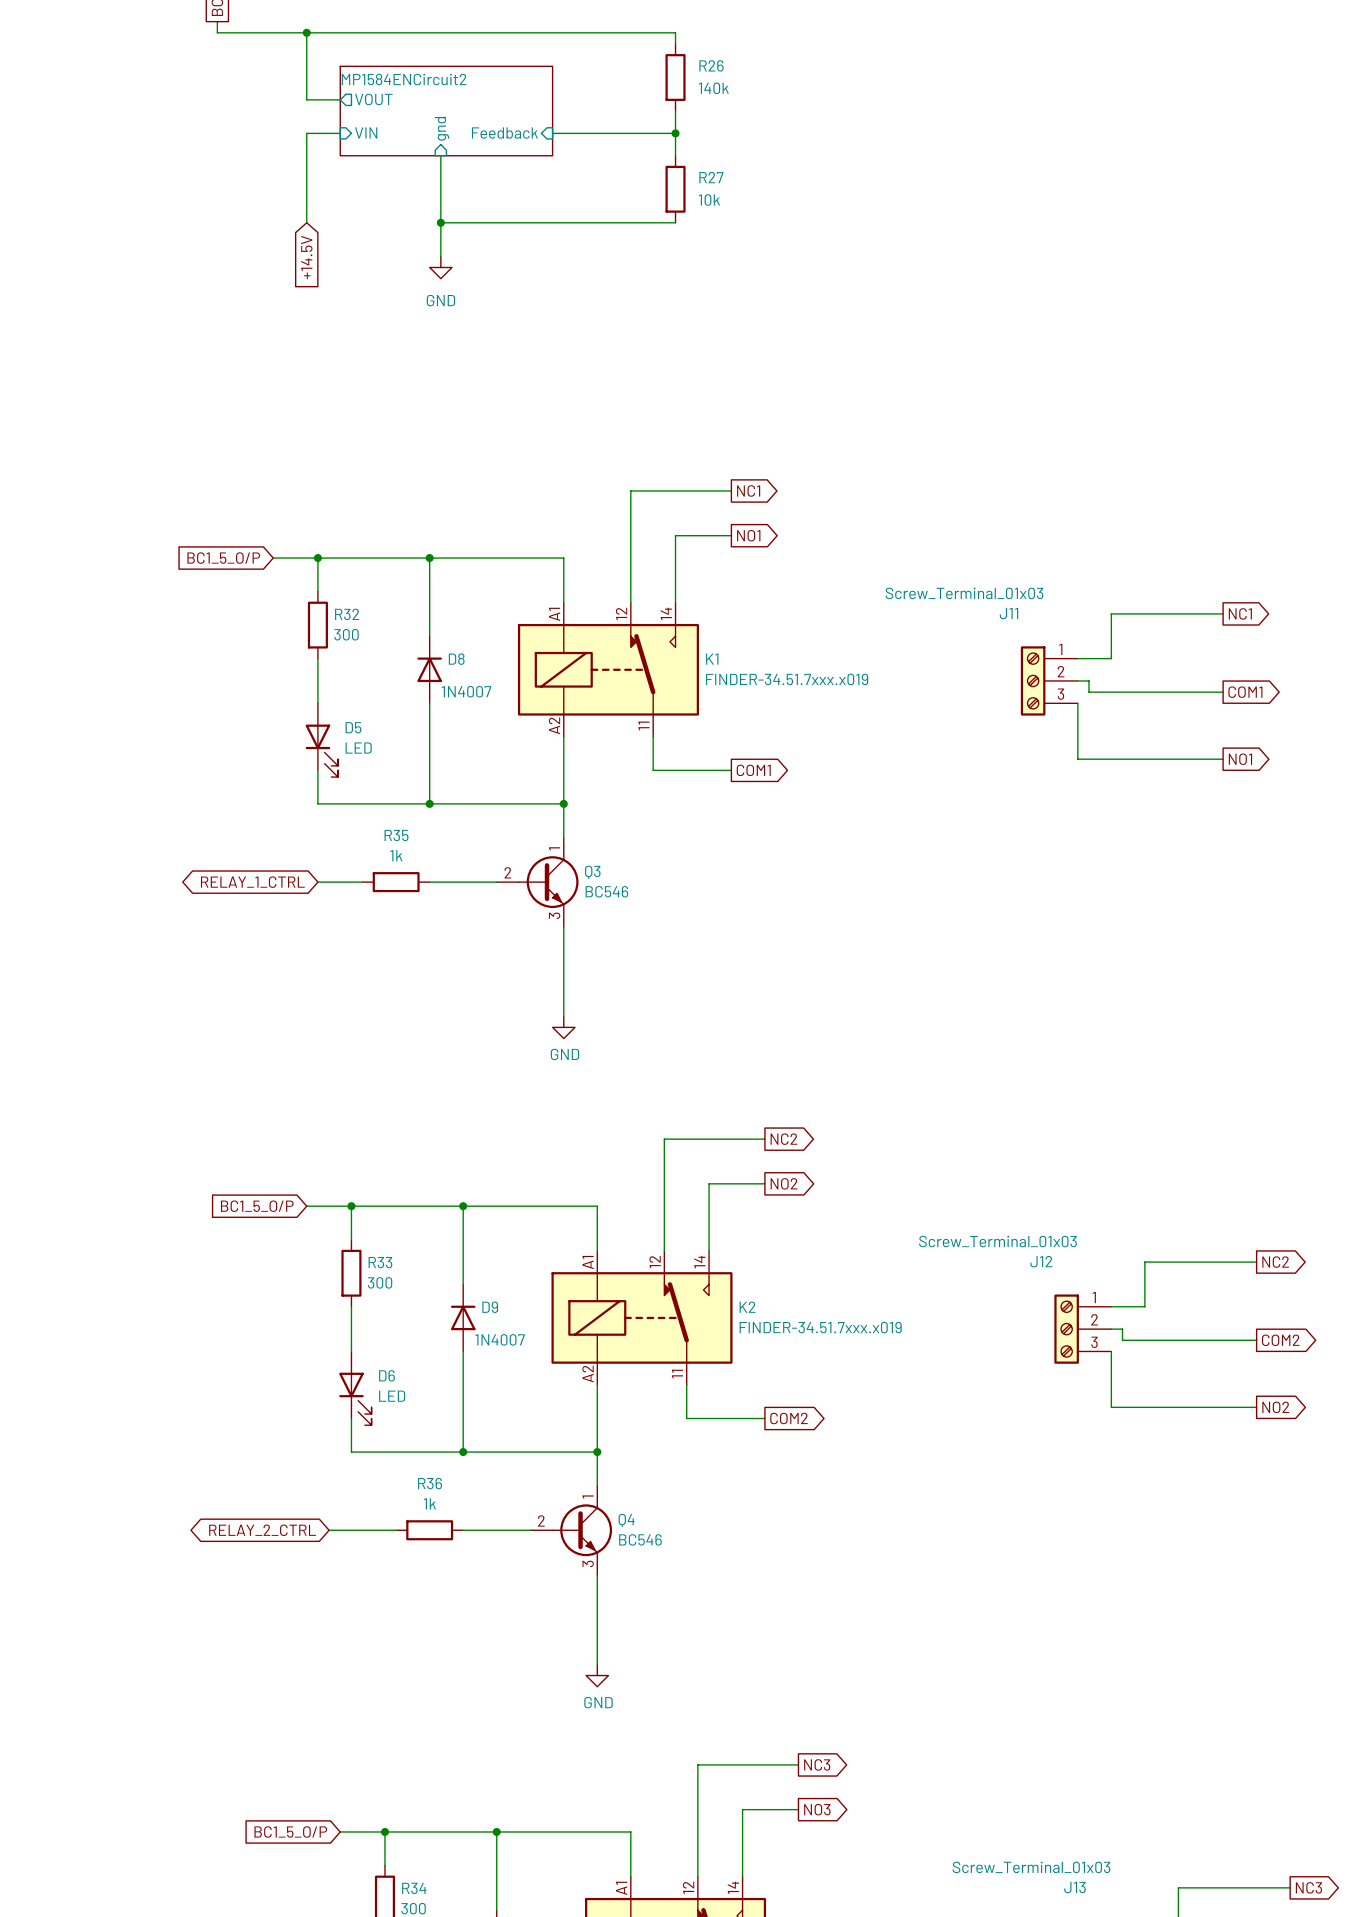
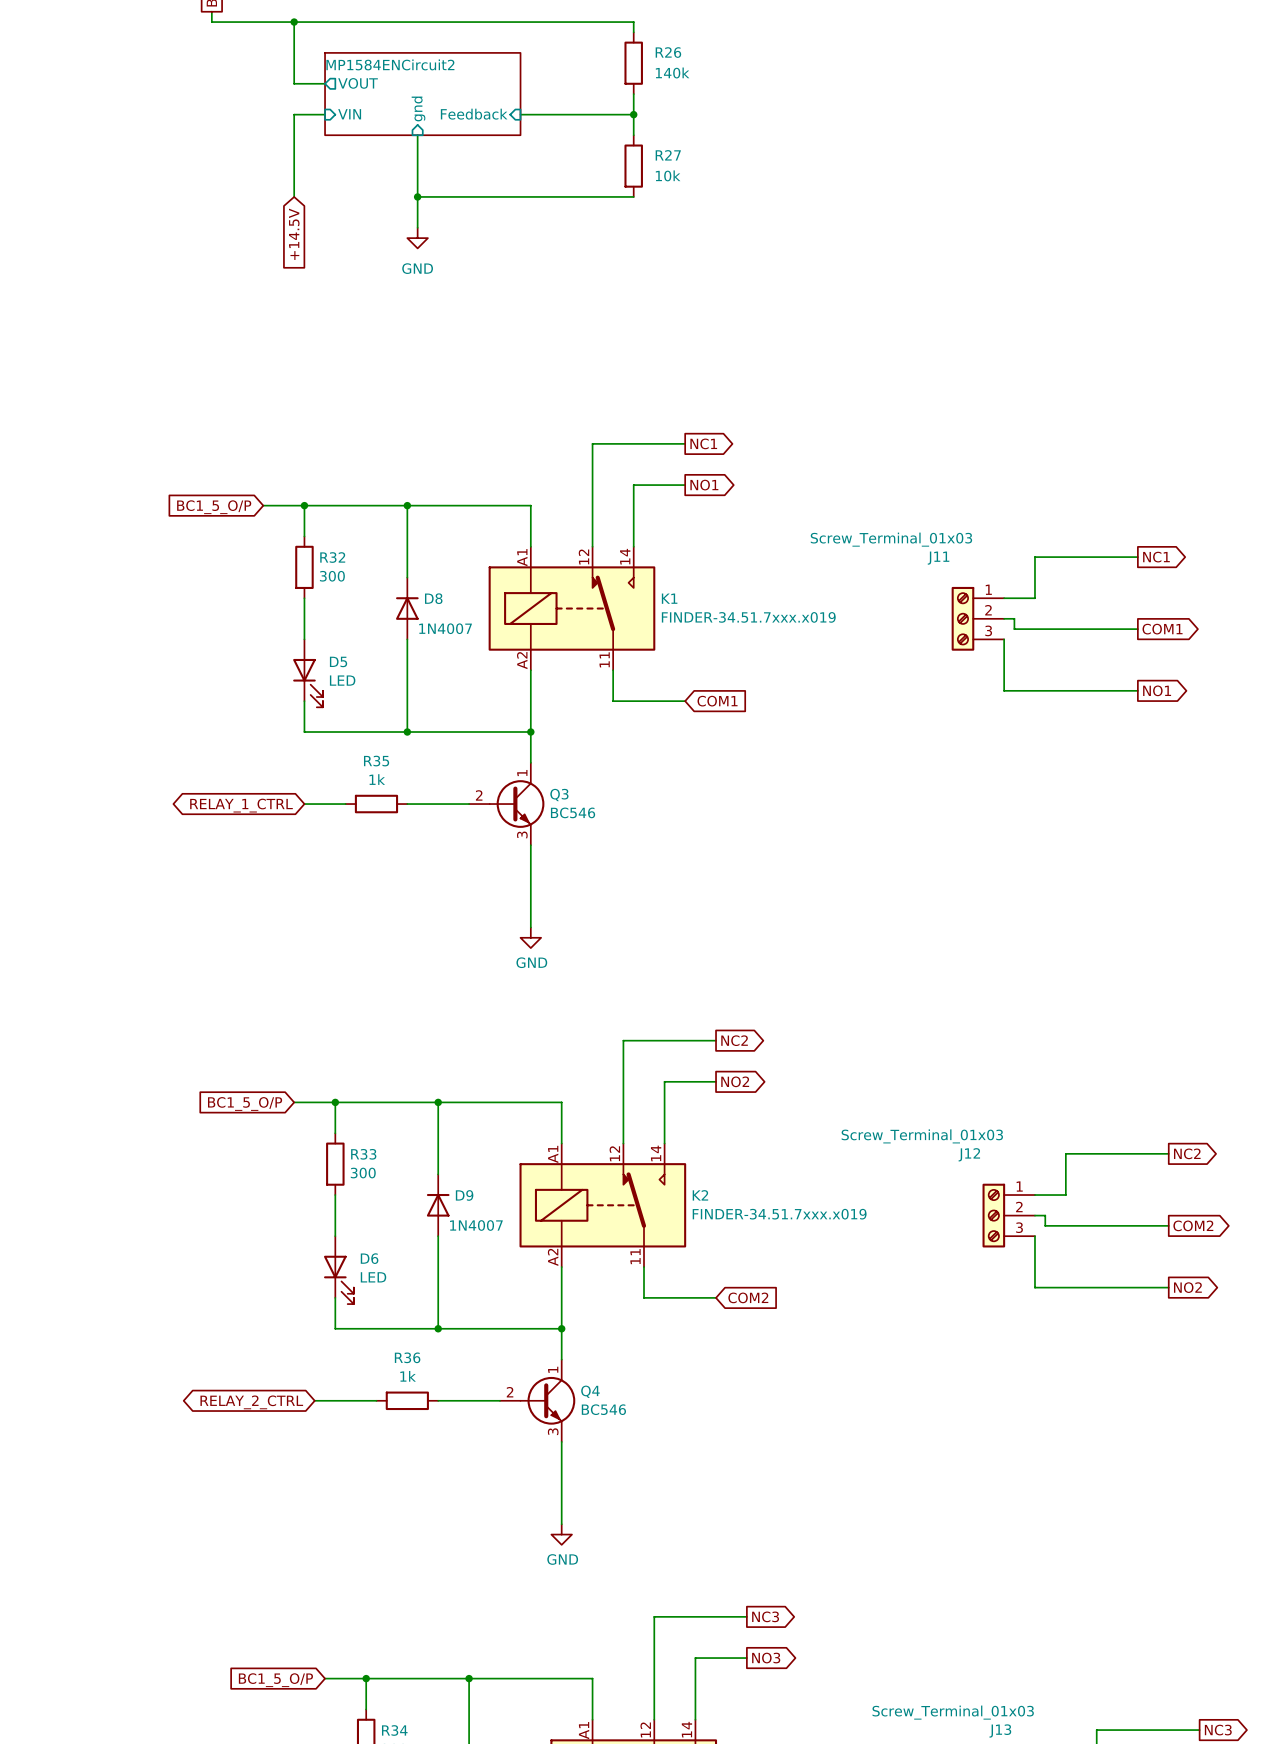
global label shape: output (753, 770) -> input (717, 701)
global label shape: output (789, 1418) -> input (748, 1297)

